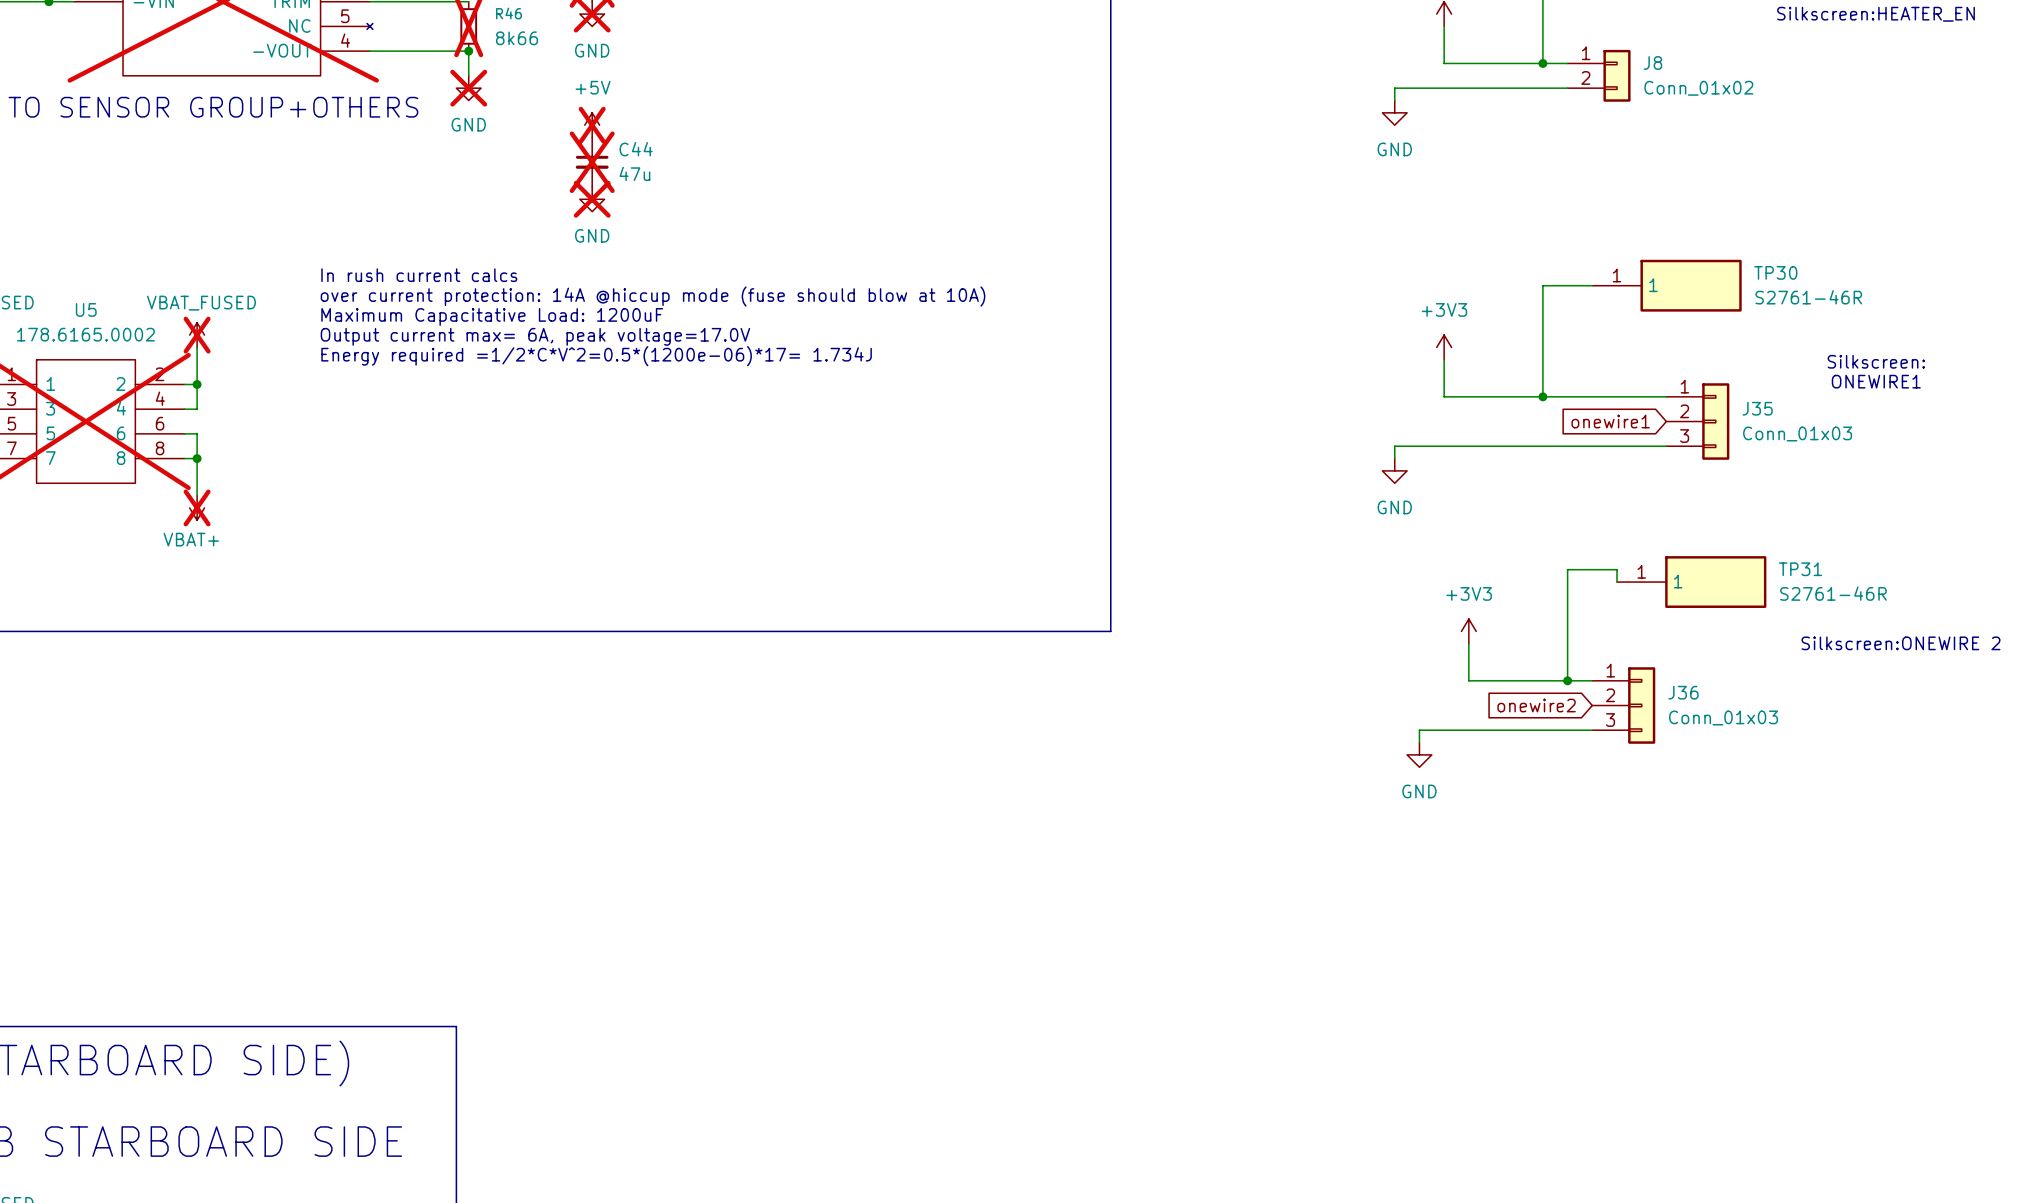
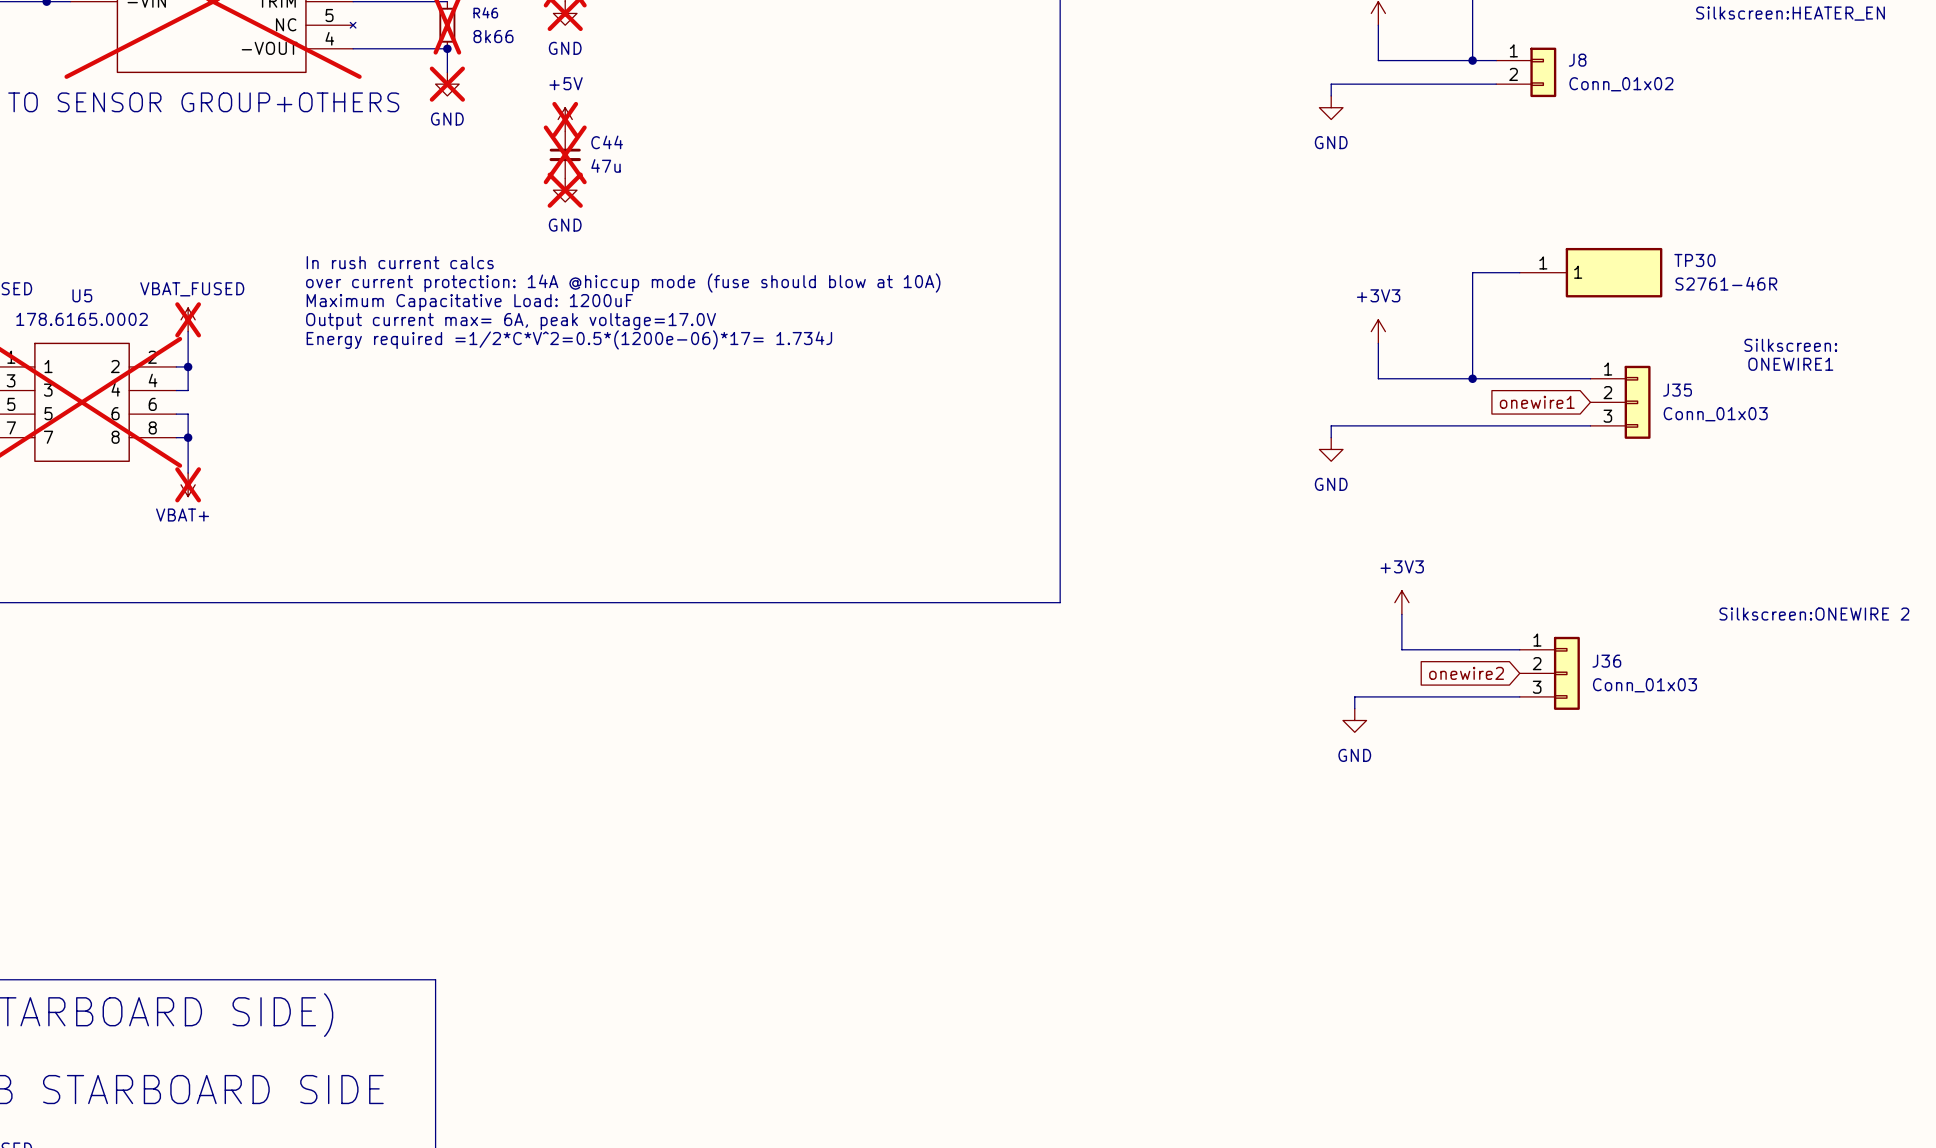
wire: (1617, 582) (1617, 569) (1567, 569) (1567, 680) -> none
TP31: S2761-46R (1691, 582) -> none
junction: (1567, 680) -> none

